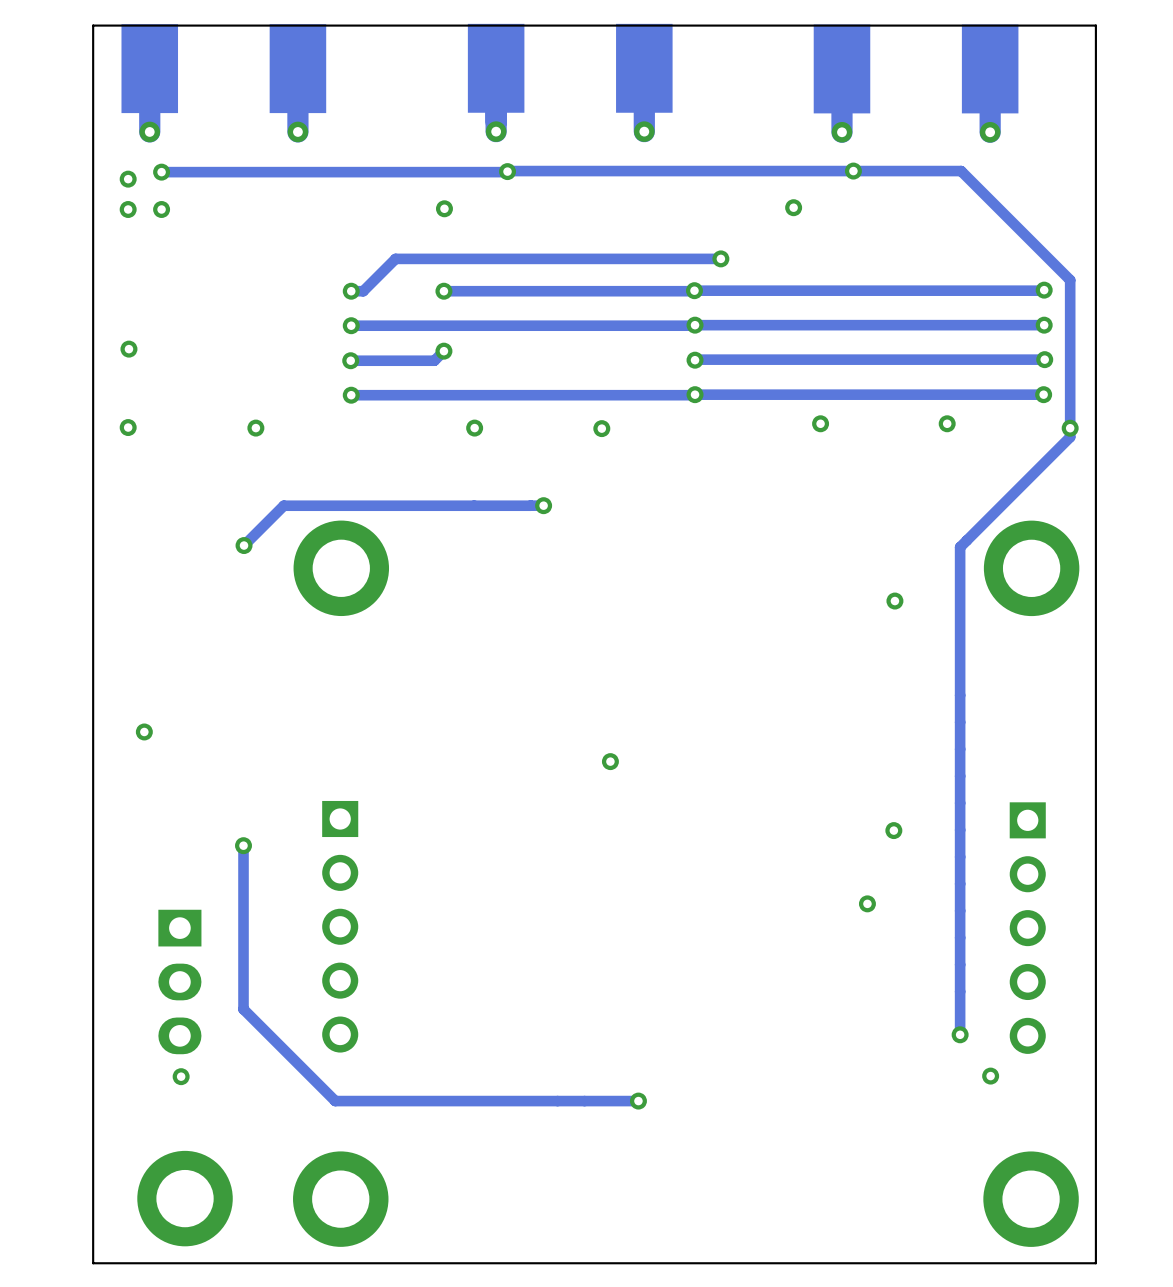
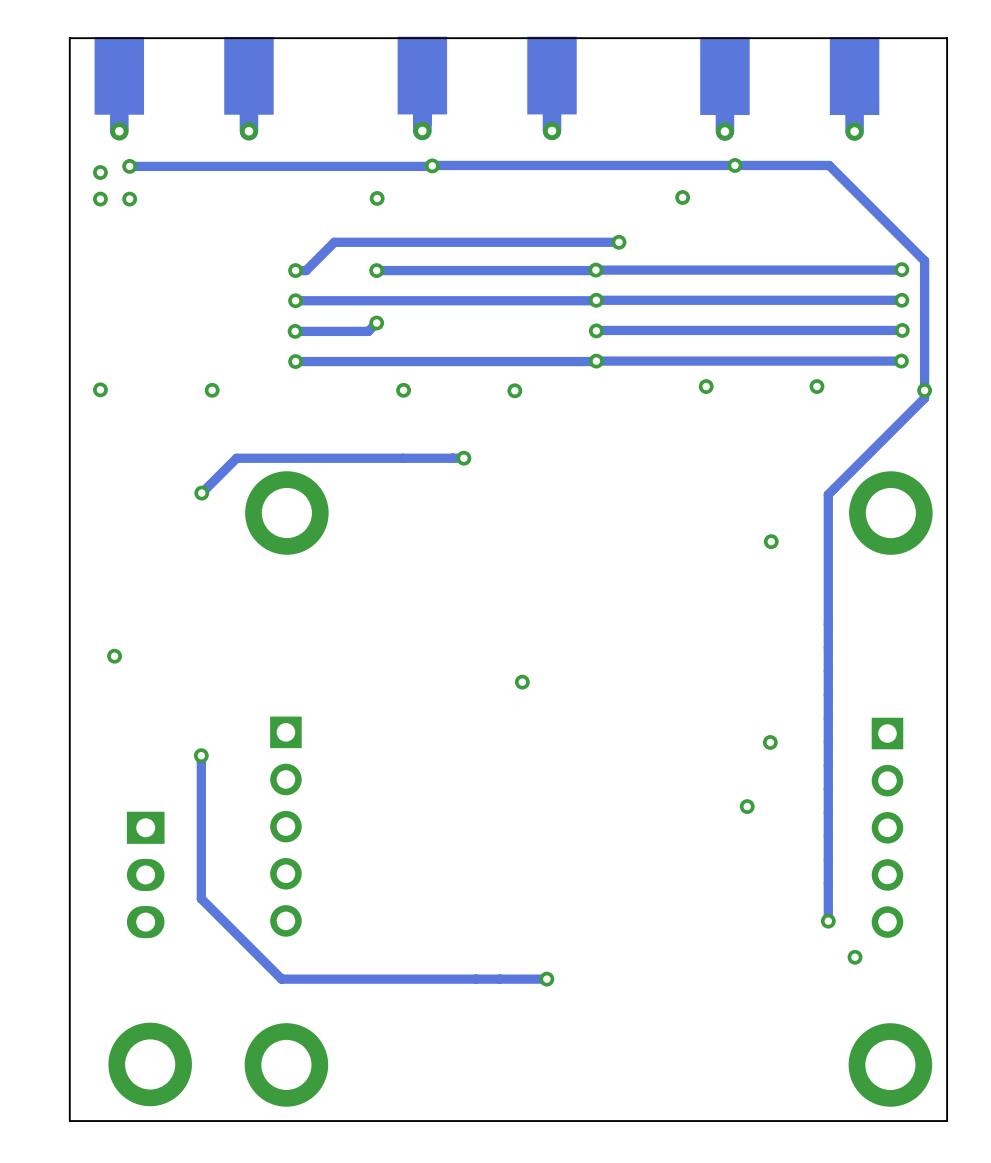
via: (128, 349) -> none
via: (181, 1076) -> none

